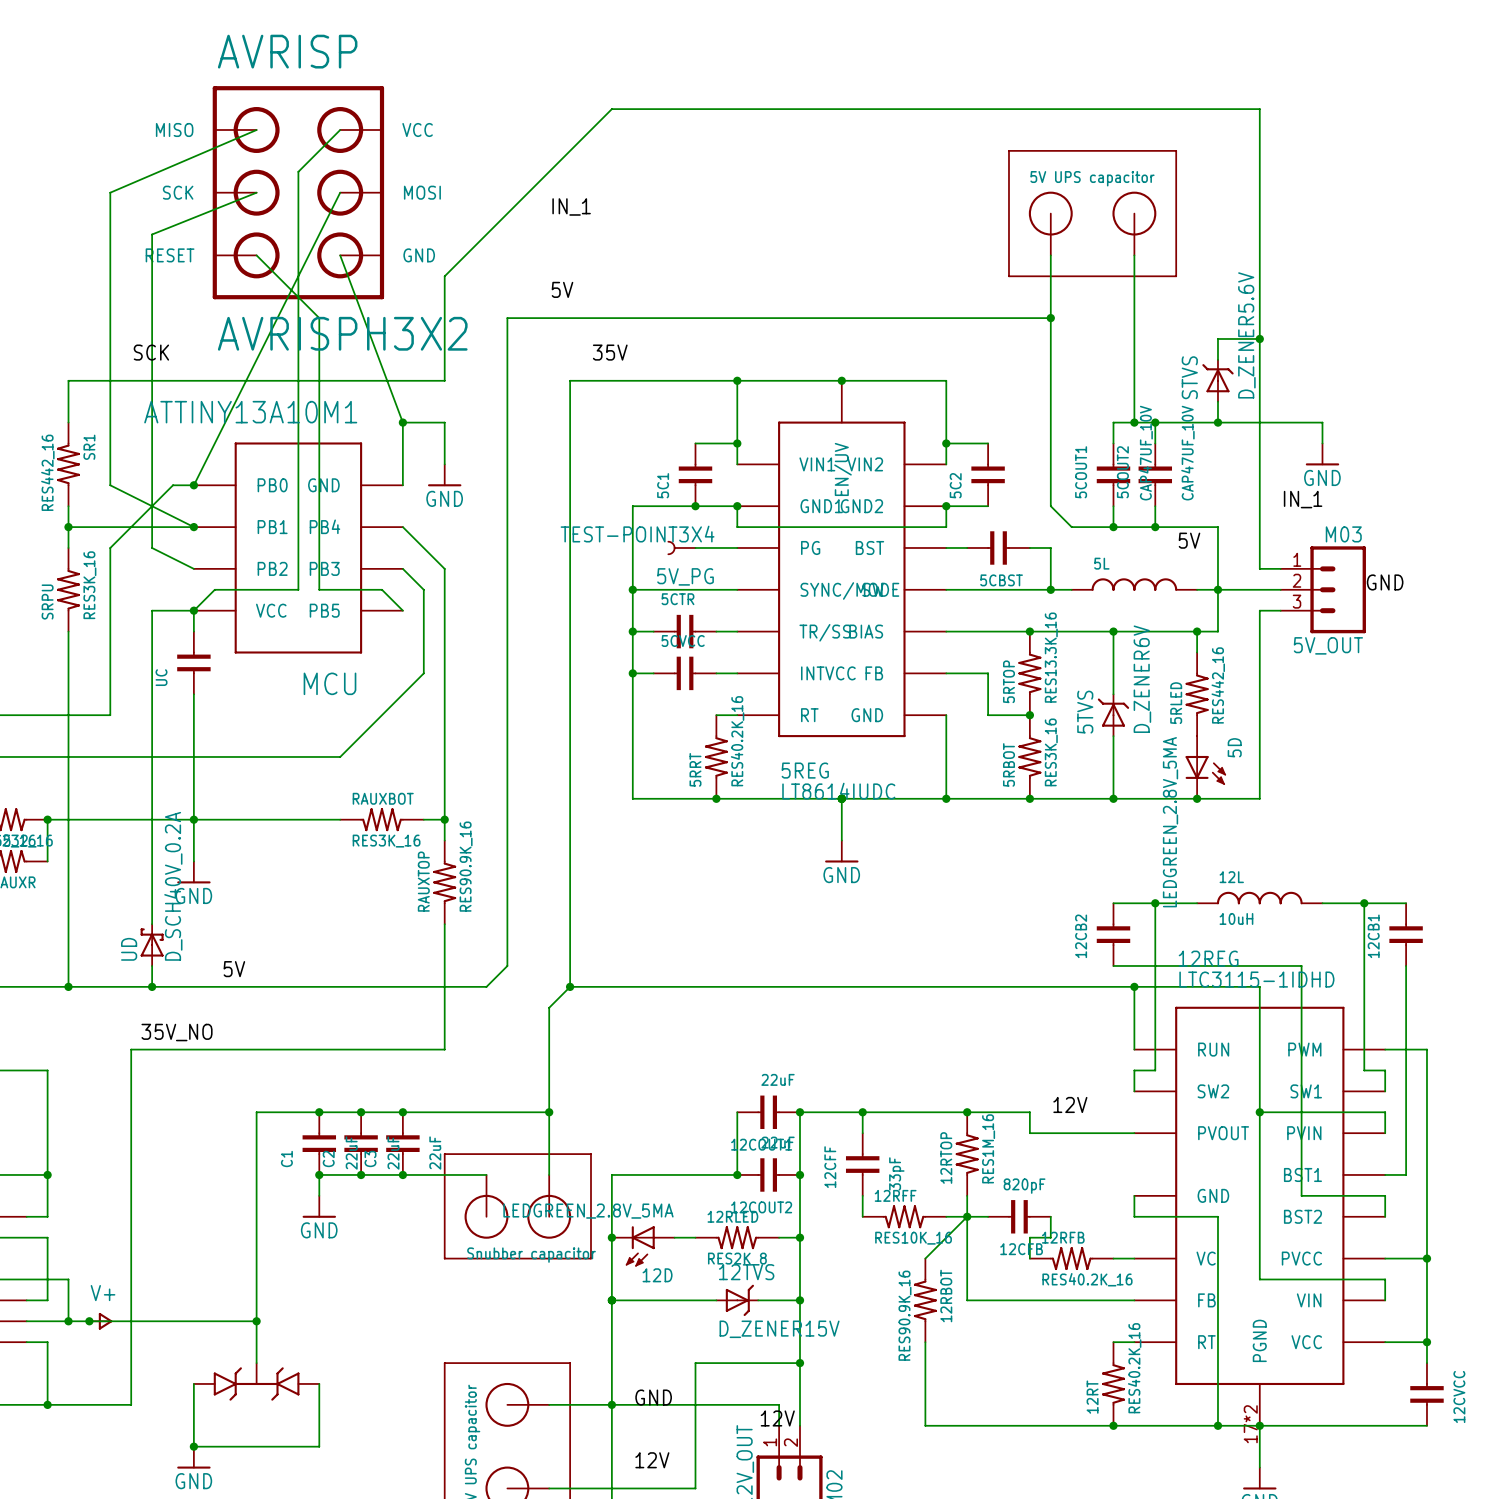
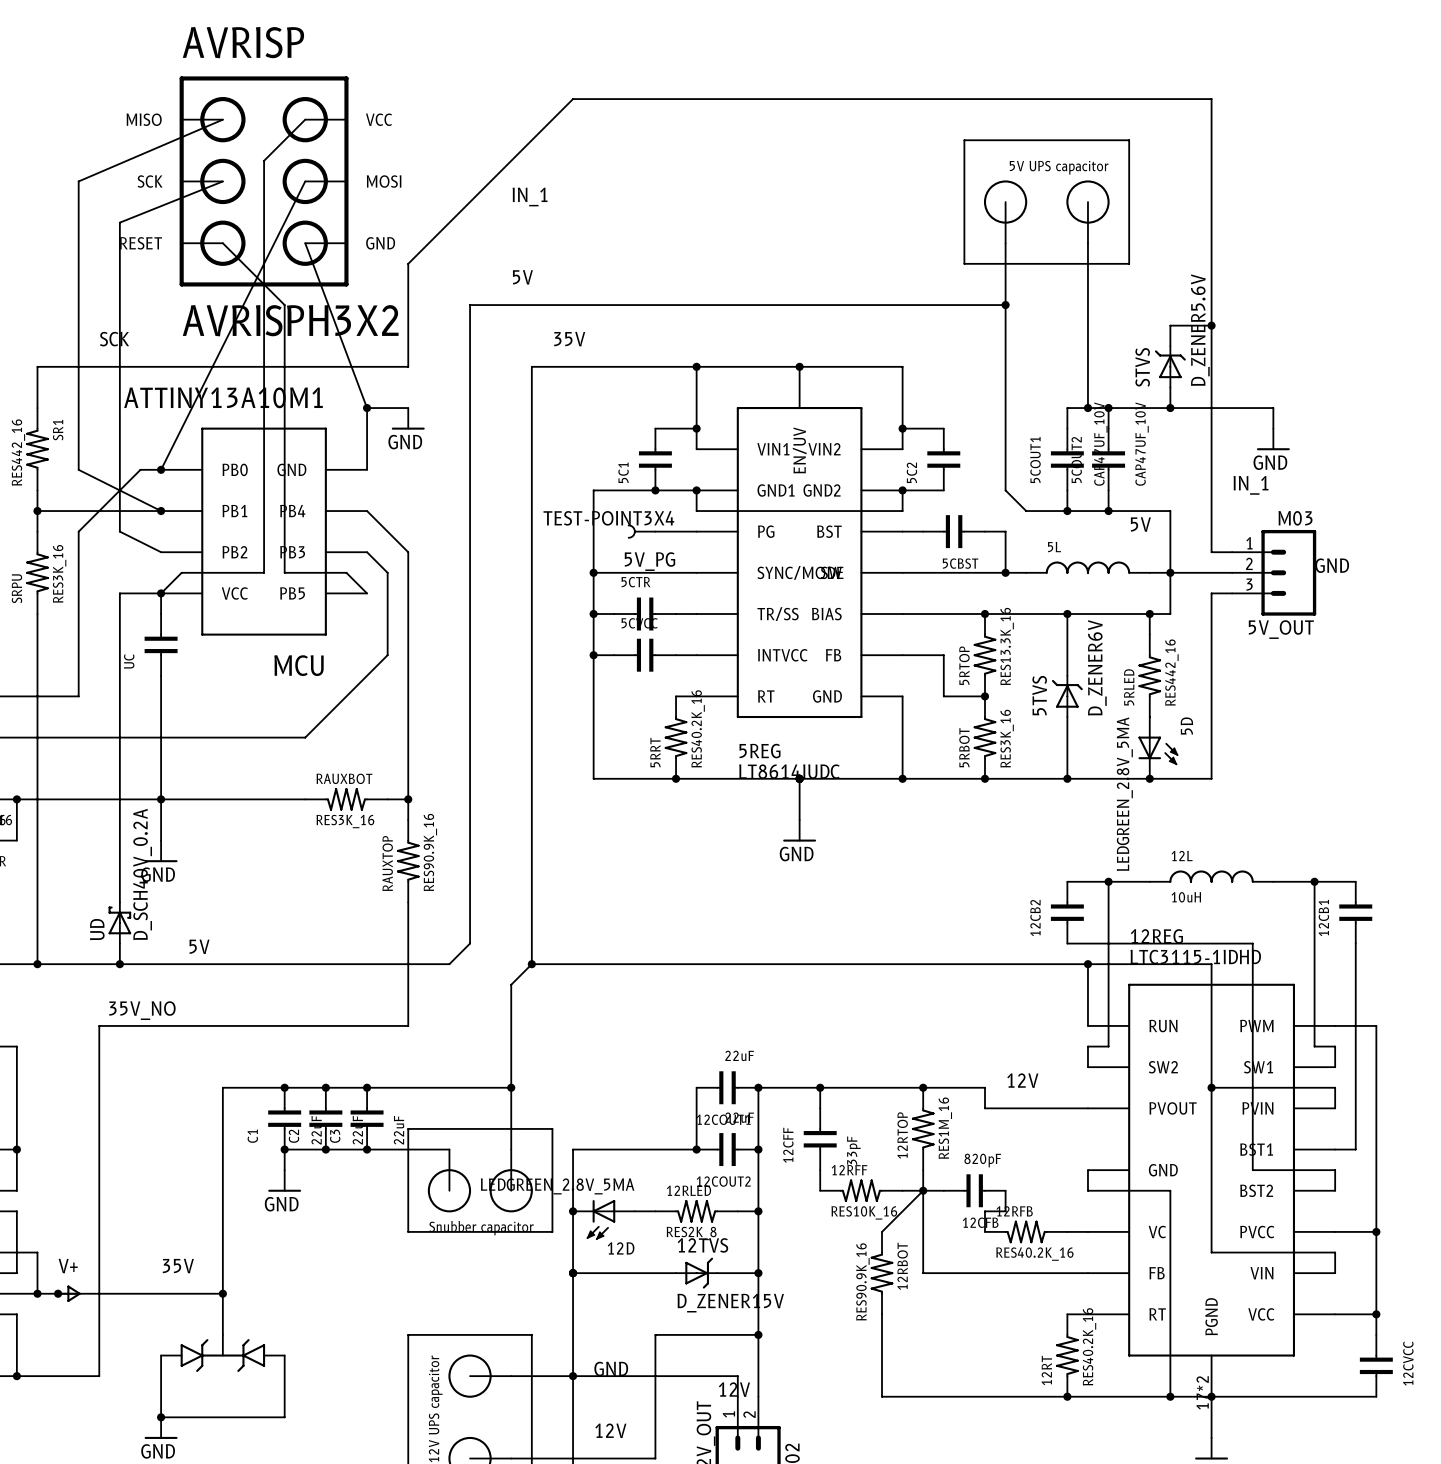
power symbol position: GND (444, 475) -> GND (408, 418)
label: none -> 35V (178, 1266)

